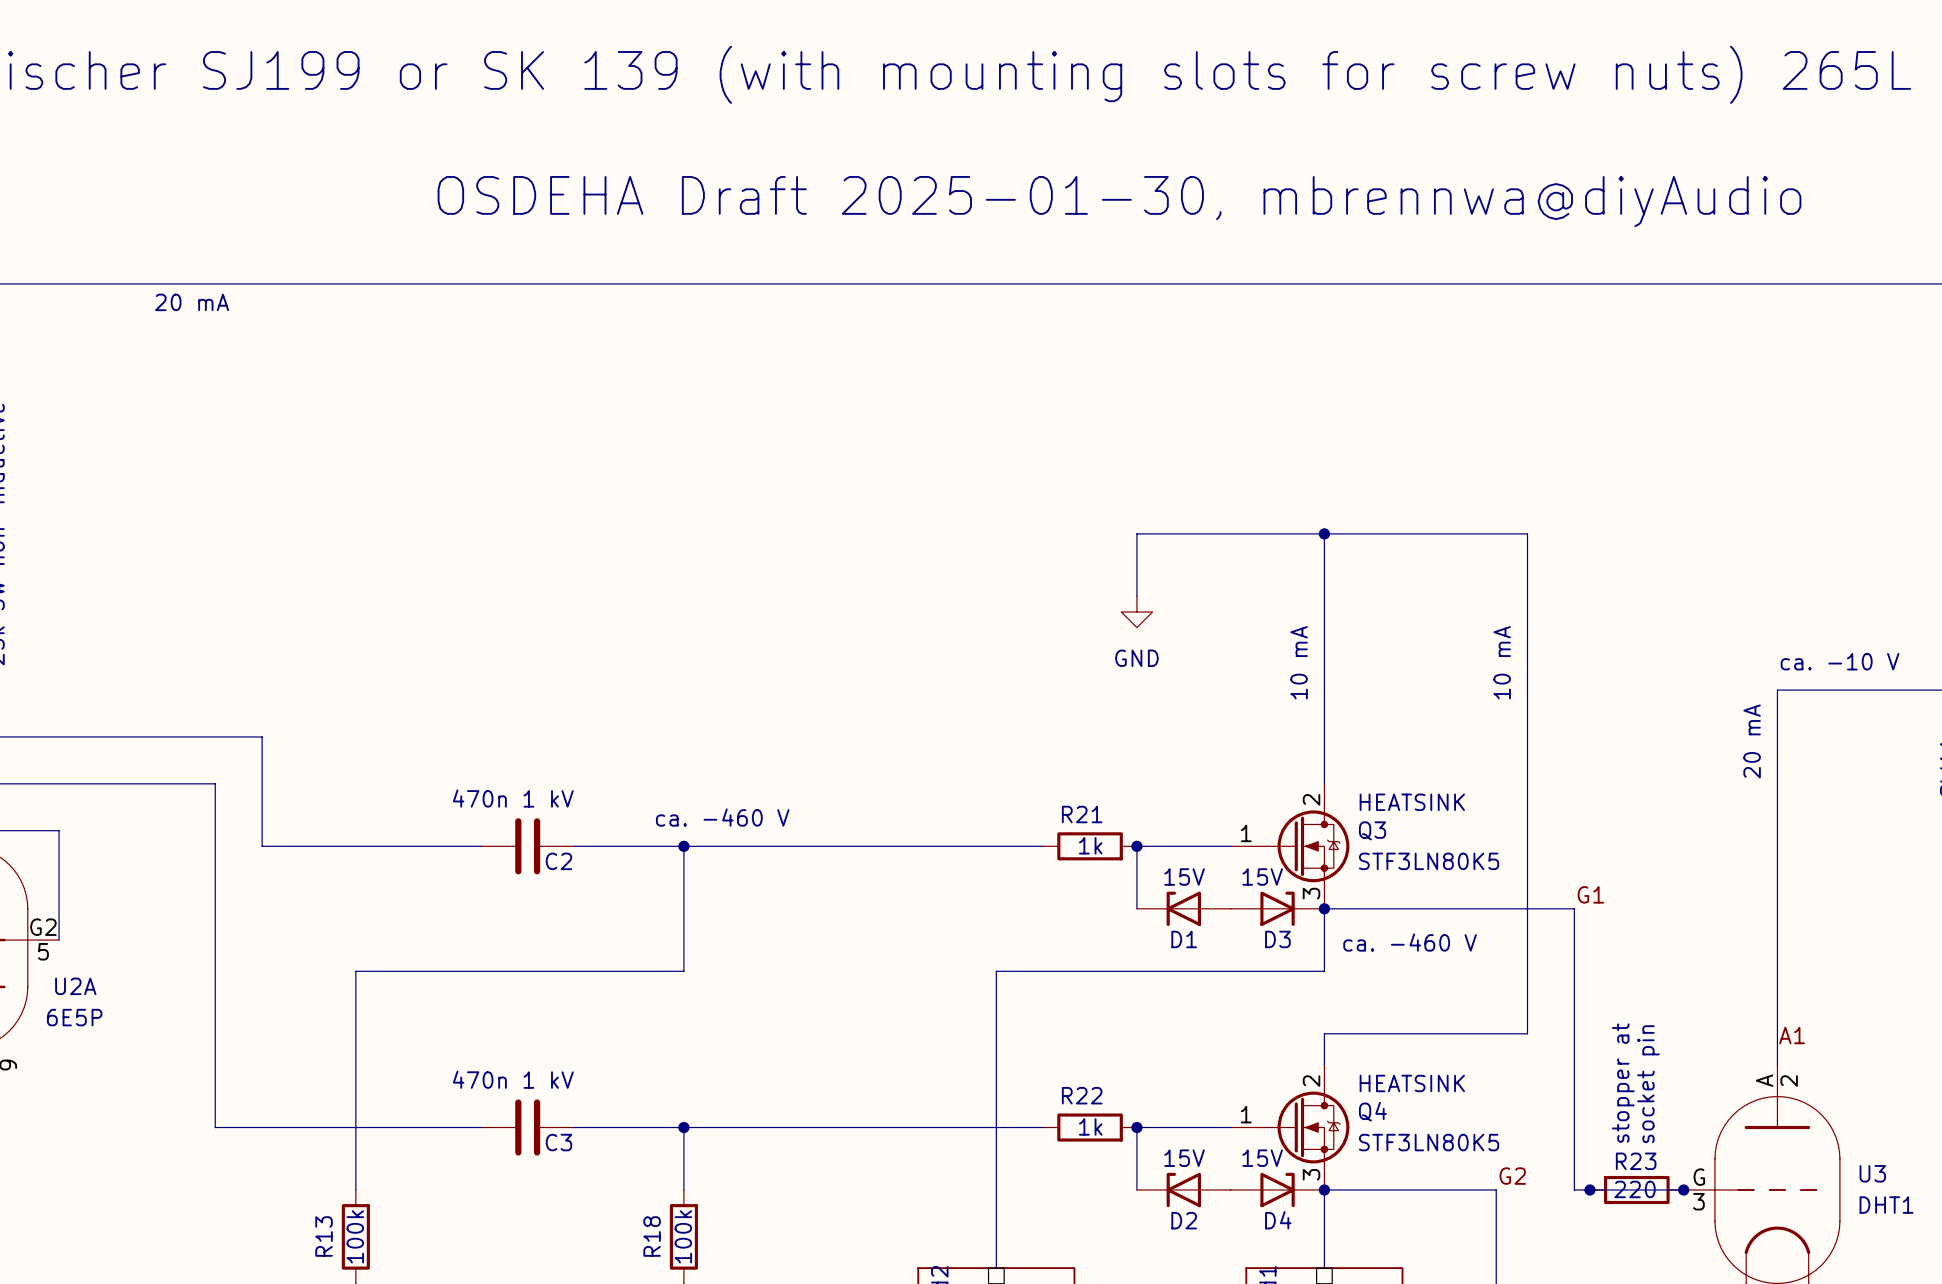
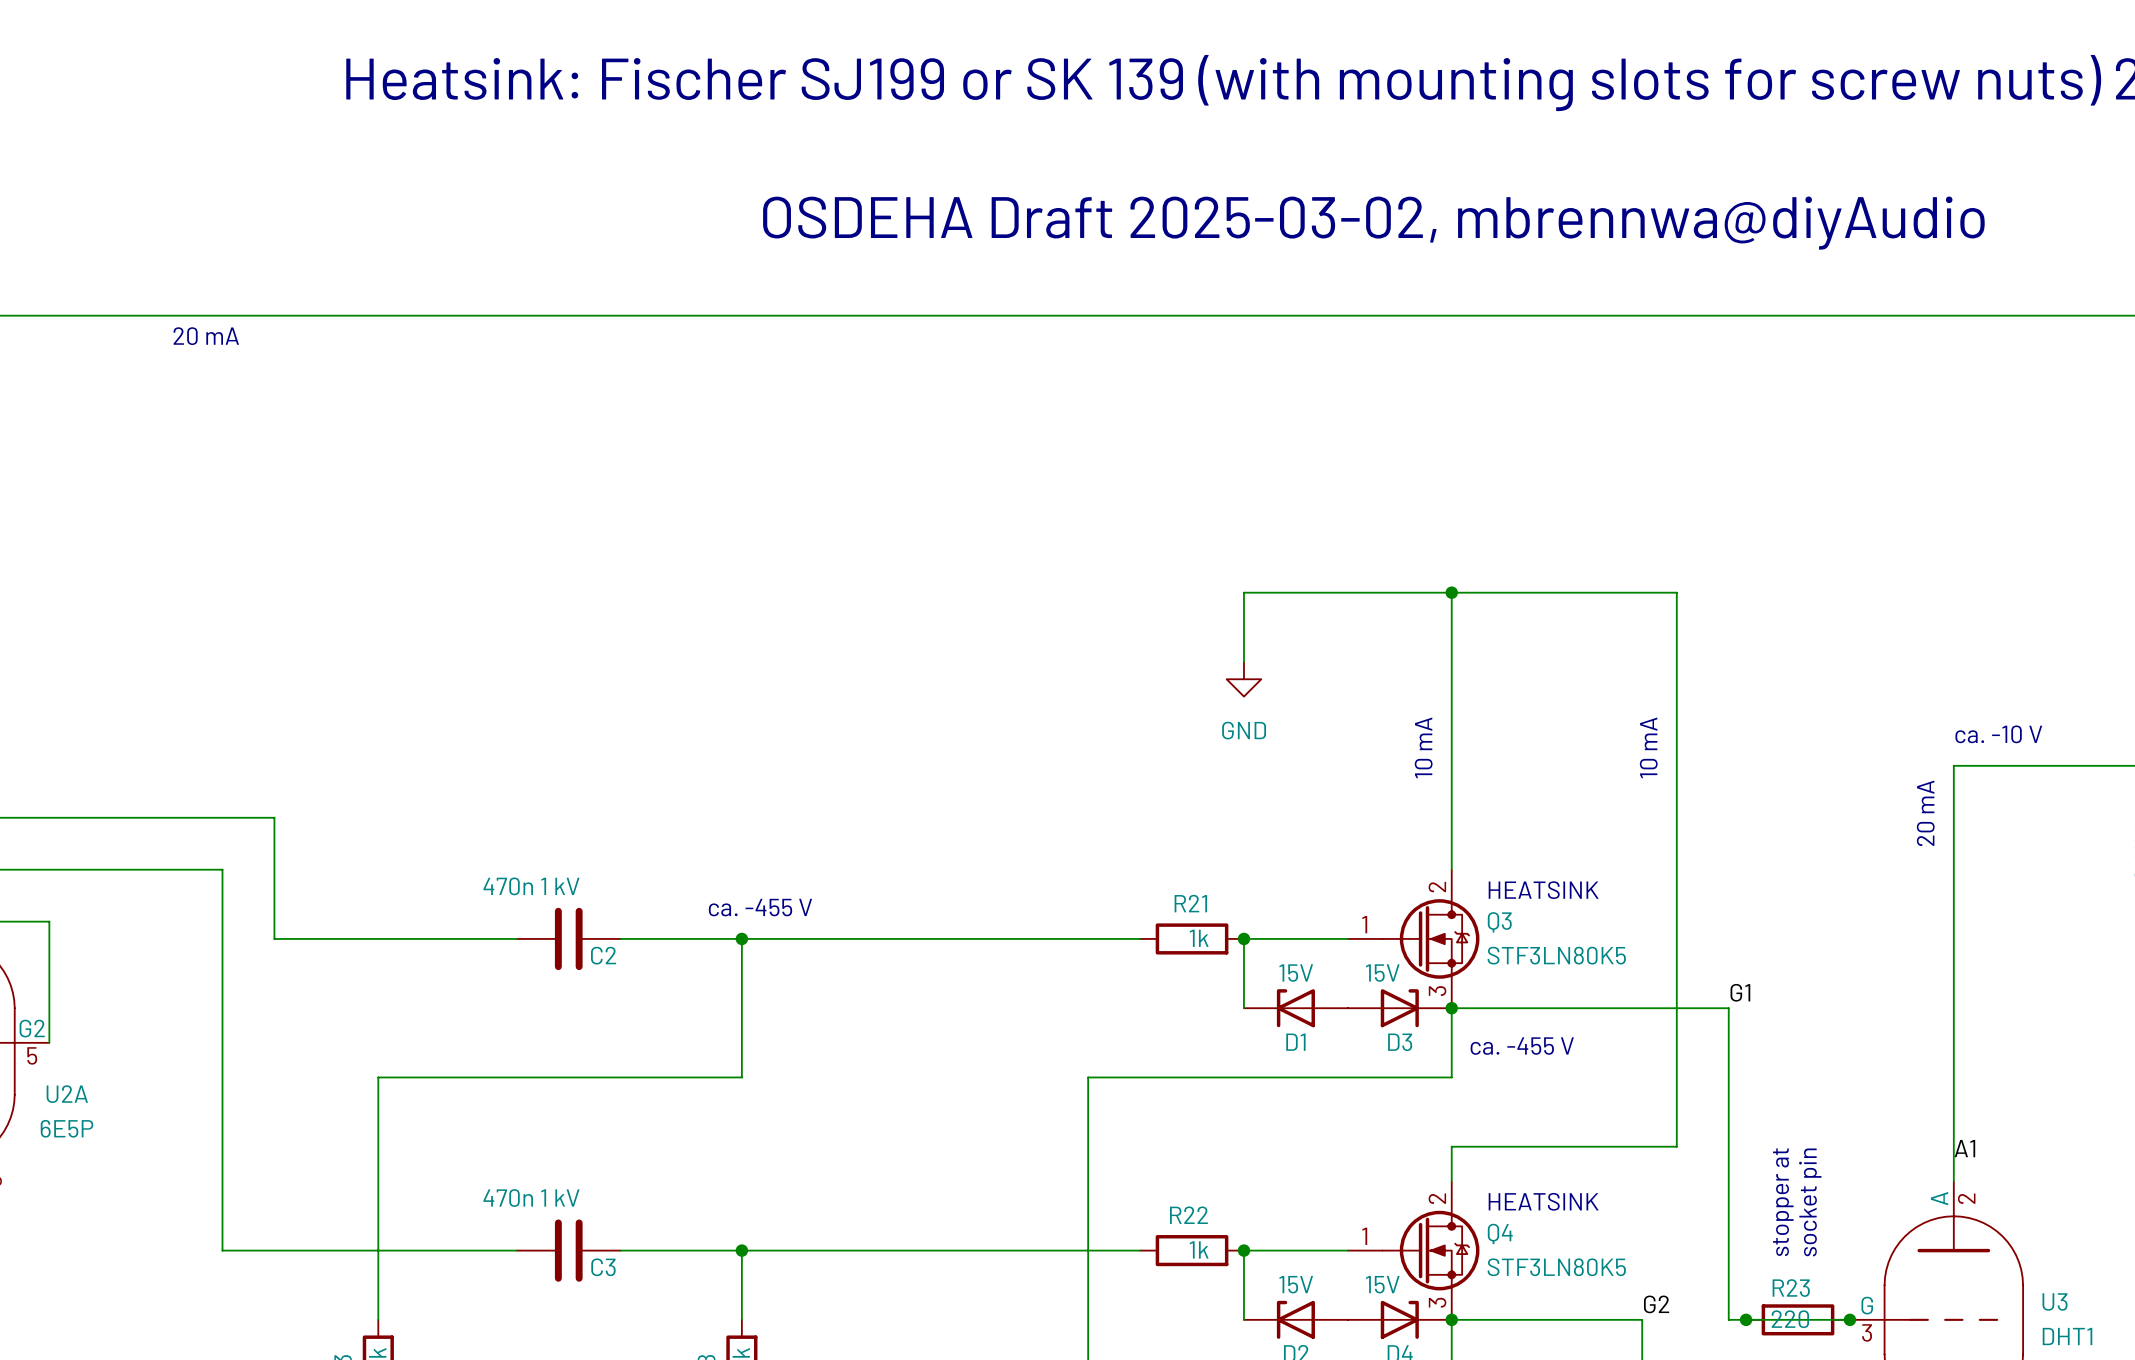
text: OSDEHA Draft 2025-01-30, mbrennwa@diyAudio (1119, 201) -> OSDEHA Draft 2025-03-02, mbrennwa@diyAudio (1373, 223)
text: ca. -460 V (722, 817) -> ca. -455 V (760, 907)
text: ca. -460 V (1410, 942) -> ca. -455 V (1522, 1046)

